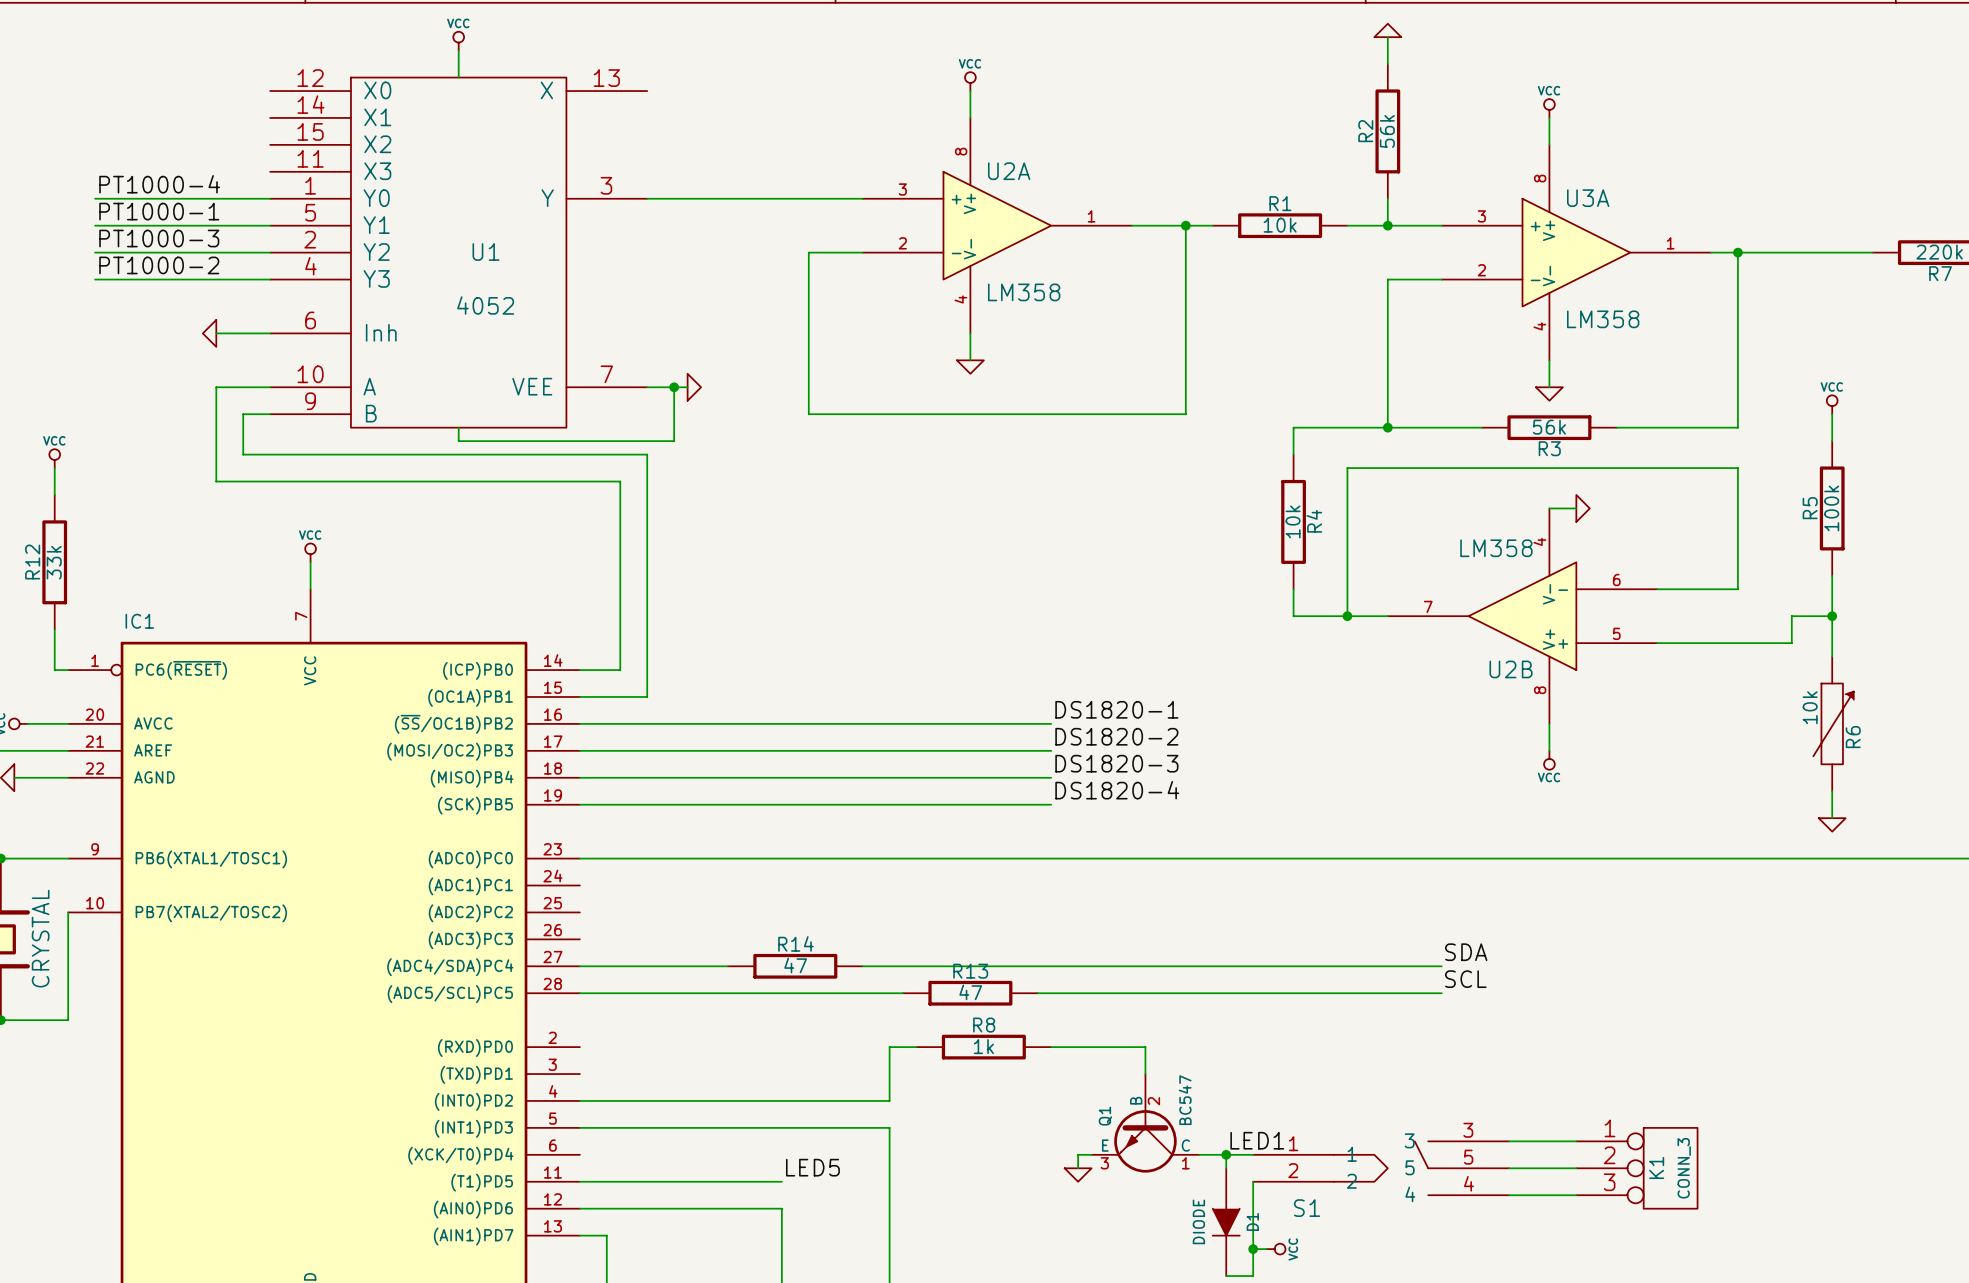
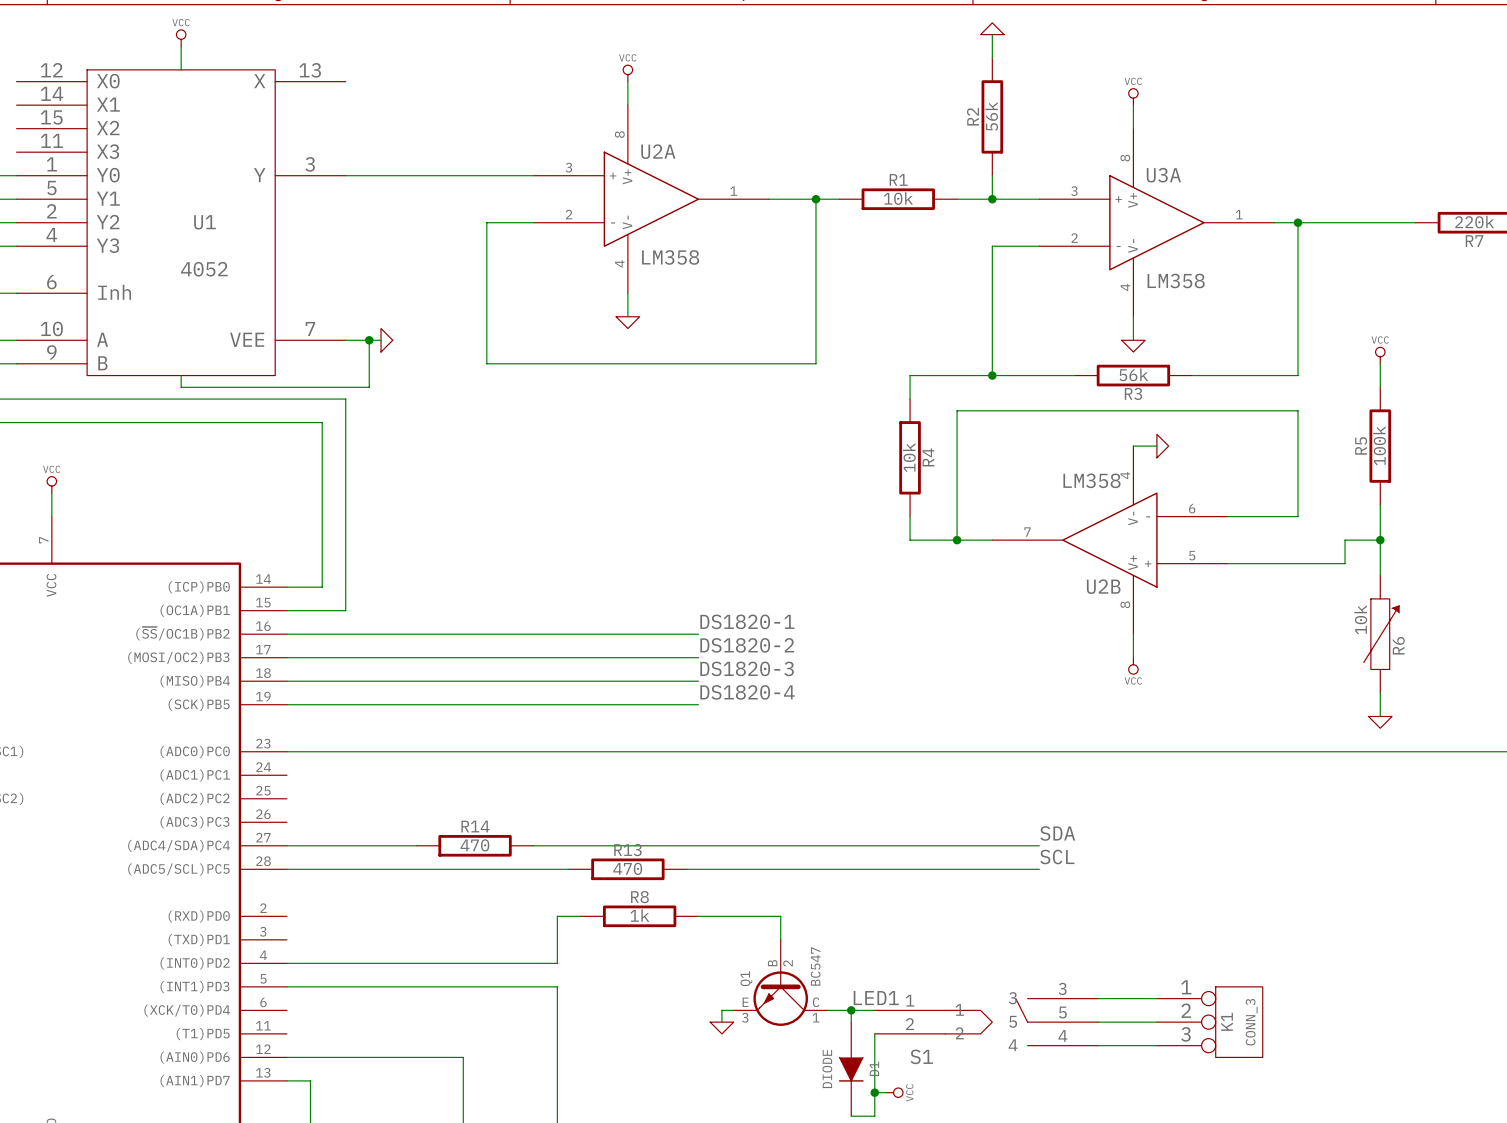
R14 value: 47 (795, 965) -> 470 (474, 845)
R13 value: 47 (970, 992) -> 470 (627, 868)
label: LED5 (812, 1167) -> none
wire: (579, 1181) (781, 1181) -> none

